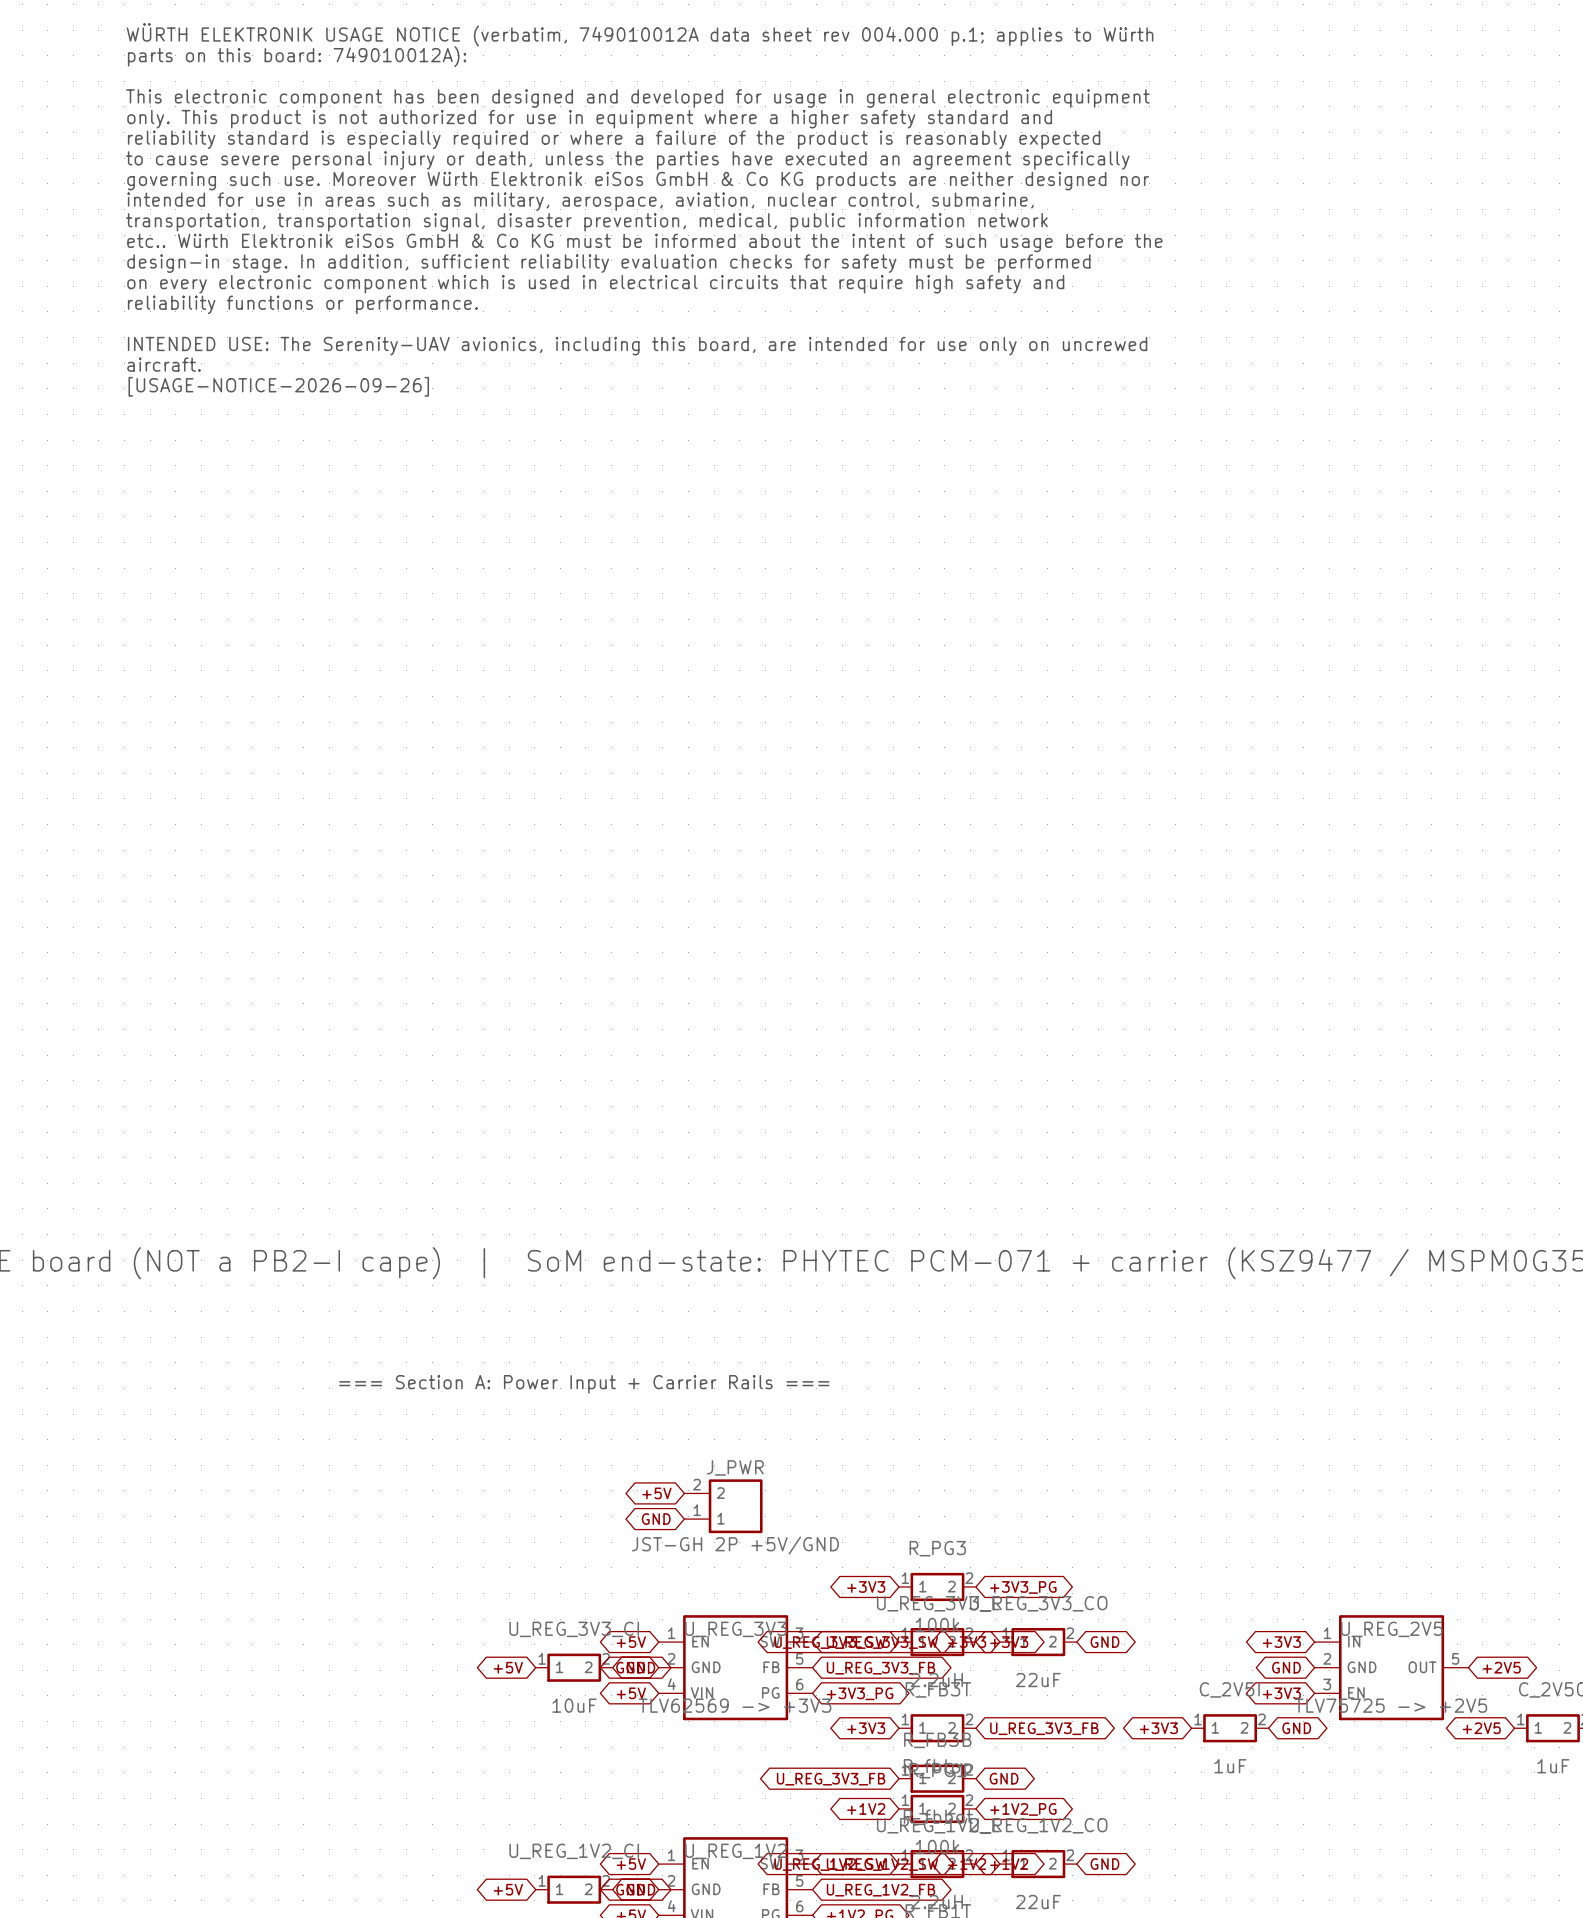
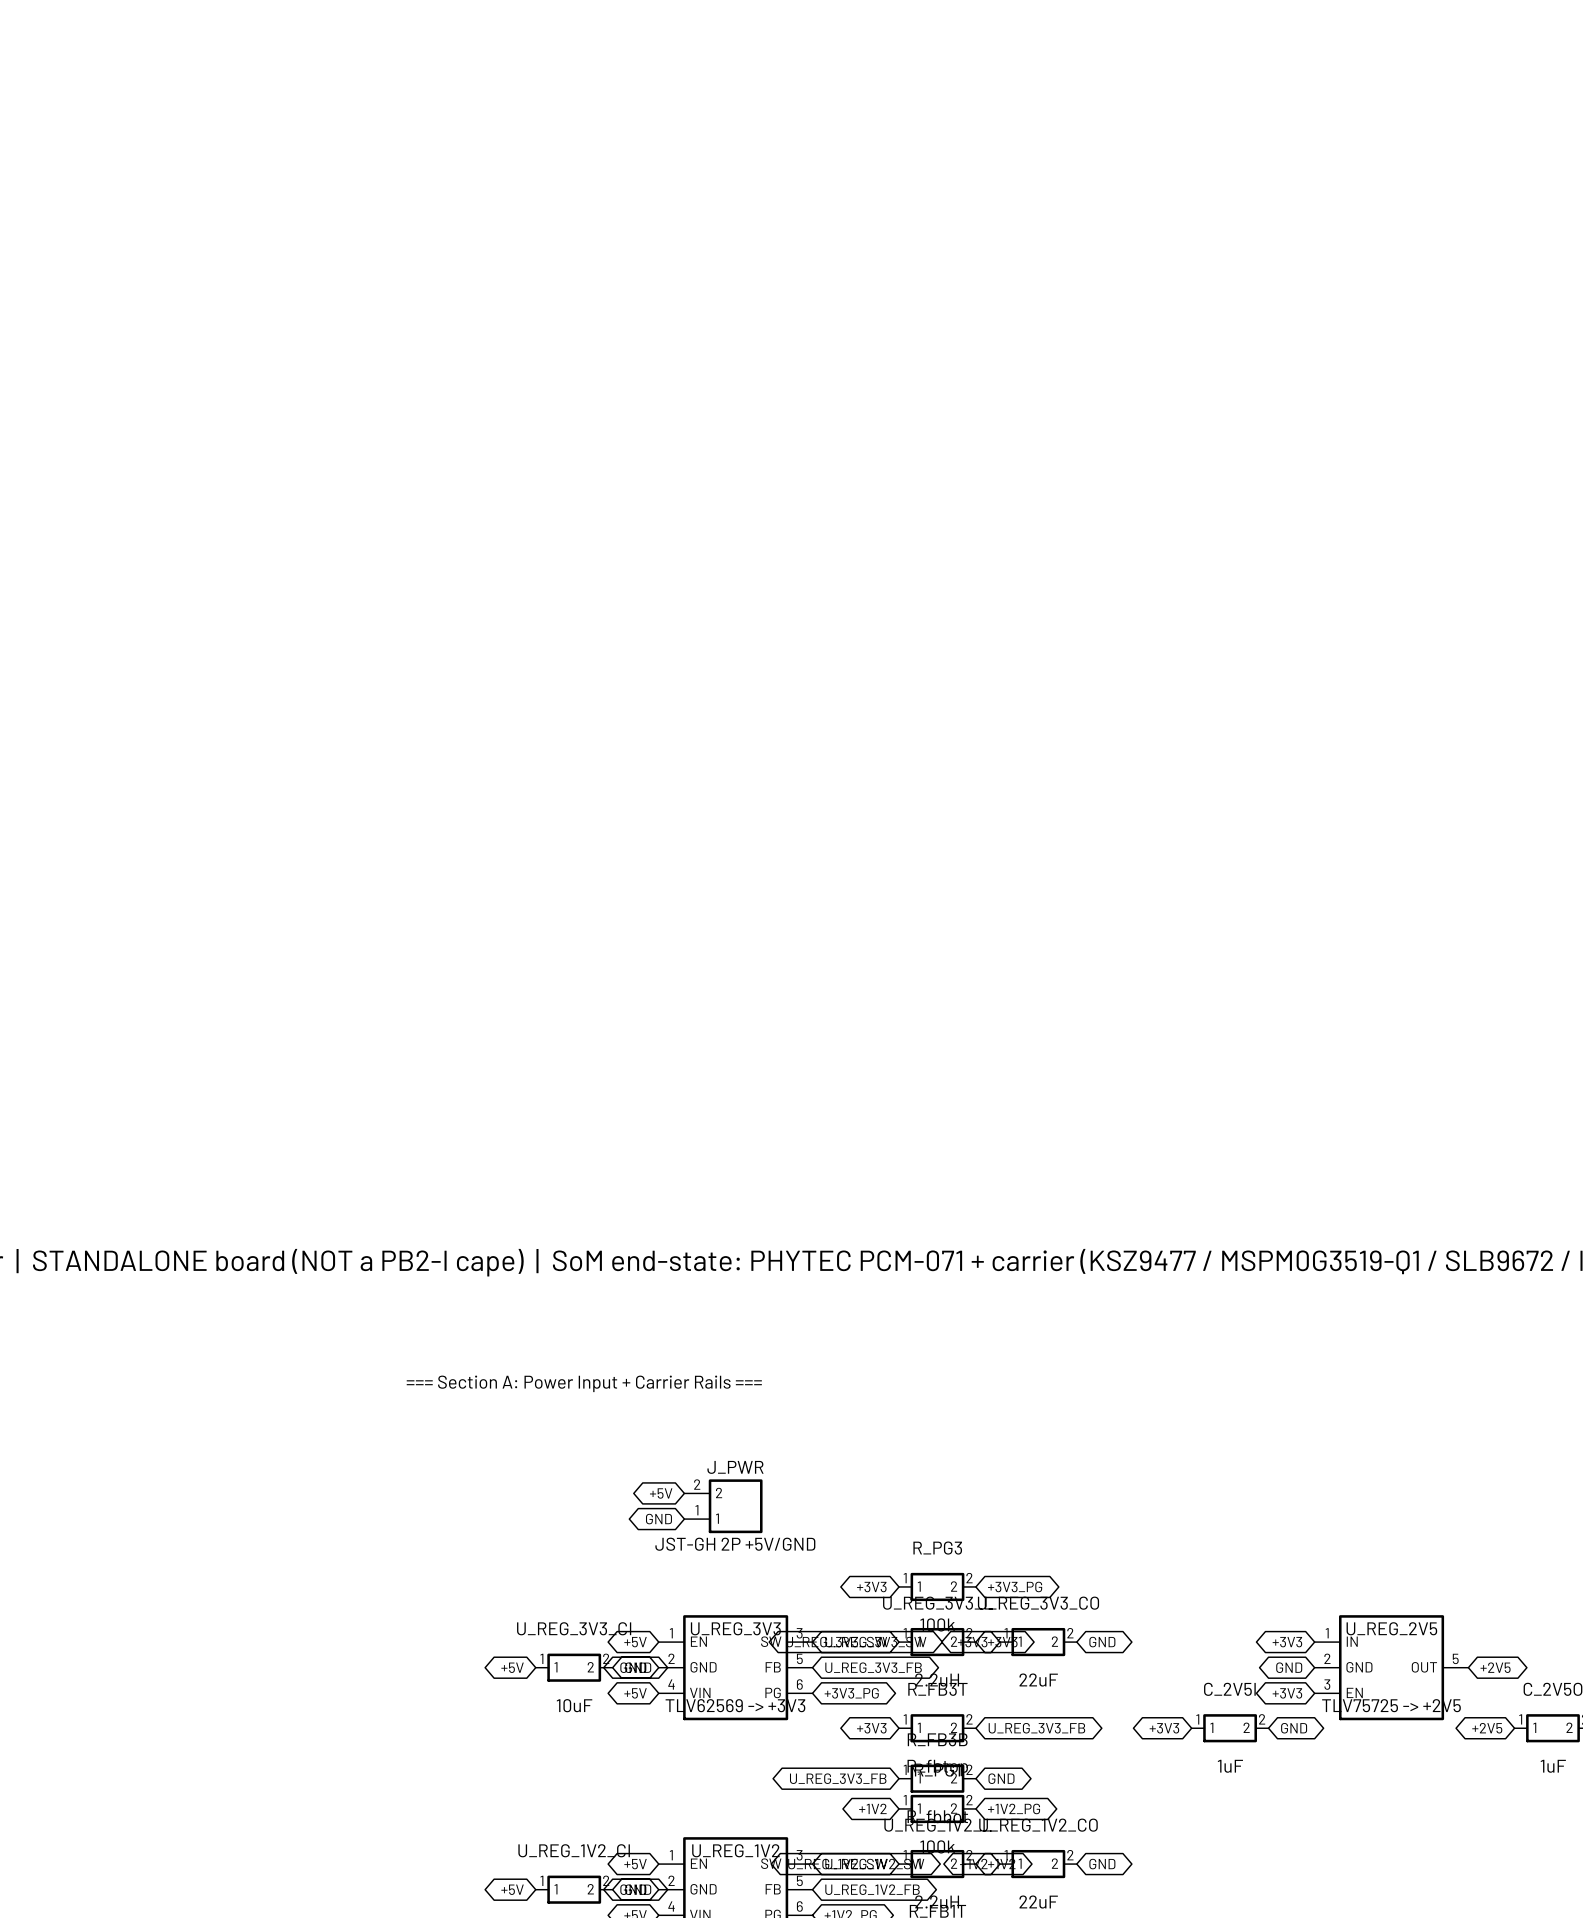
text: WÜRTH ELEKTRONIK USAGE NOTICE (verbatim, 749010012A data sheet rev 004.000 p.1; applies to Würth (640, 34) -> none
text: parts on this board: 749010012A): (297, 56) -> none
text: This electronic component has been designed and developed for usage in general electronic equipment (637, 98) -> none
text: only. This product is not authorized for use in equipment where a higher safety standard and (589, 119) -> none
text: reliability standard is especially required or where a failure of the product is reasonably expected (614, 139) -> none
text: to cause severe personal injury or death, unless the parties have executed an agreement specifically (627, 160) -> none
text: governing such use. Moreover Würth Elektronik eiSos GmbH & Co KG products are neither designed nor (638, 181) -> none
text: intended for use in areas such as military, aerospace, aviation, nuclear control, submarine, (580, 201) -> none
text: transportation, transportation signal, disaster prevention, medical, public information network (586, 222) -> none
text: etc.. Würth Elektronik eiSos GmbH & Co KG must be informed about the intent of such usage before the (644, 242) -> none
text: design-in stage. In addition, sufficient reliability evaluation checks for safety must be performed (608, 263) -> none
text: on every electronic component which is used in electrical circuits that require high safety and (595, 284) -> none
text: reliability functions or performance. (302, 304) -> none
text: INTENDED USE: The Serenity-UAV avionics, including this board, are intended for use only on uncrewed (637, 346) -> none
text: aircraft. (164, 364) -> none
text: [USAGE-NOTICE-2026-09-26] (278, 386) -> none

